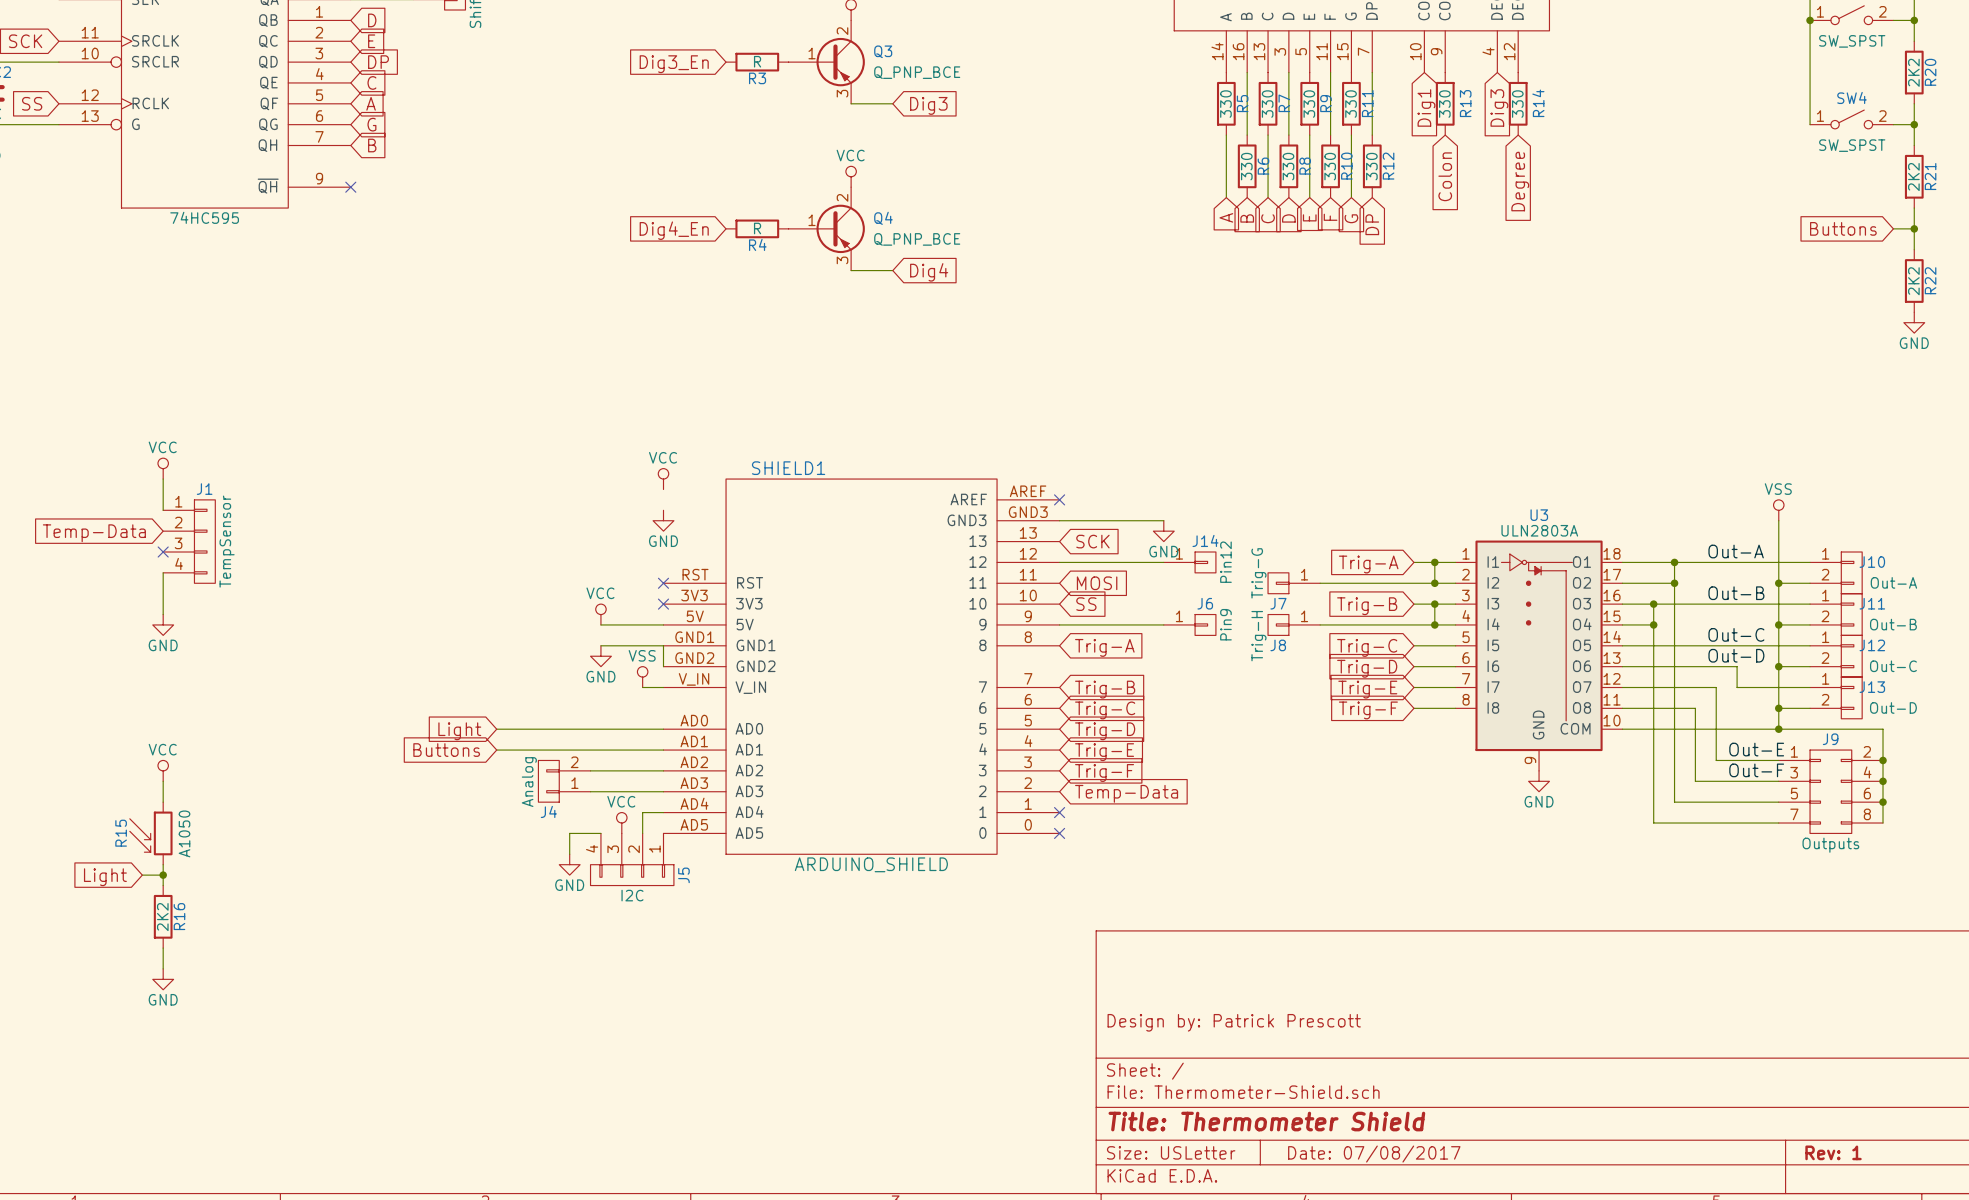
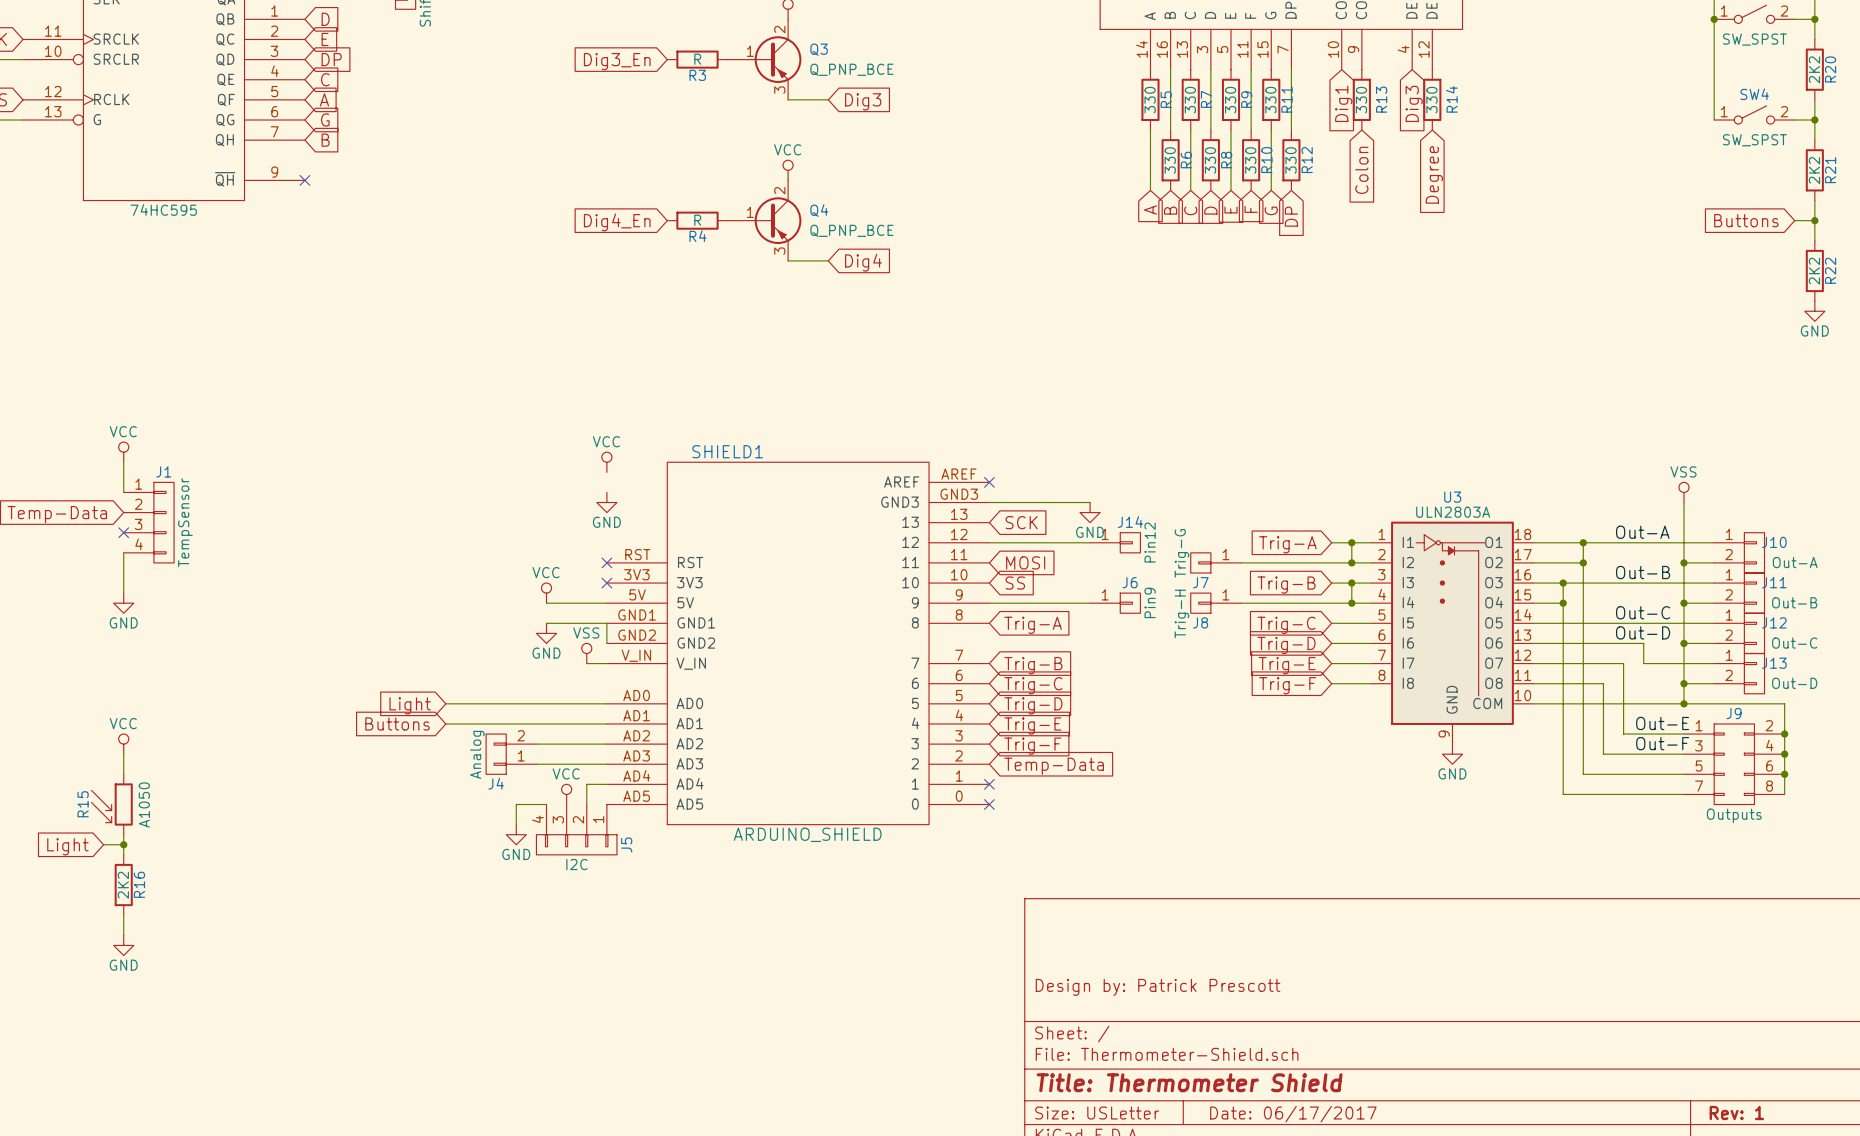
title block: Date: 07/08/2017 (1374, 1154) -> Date: 06/17/2017 (1293, 1114)

